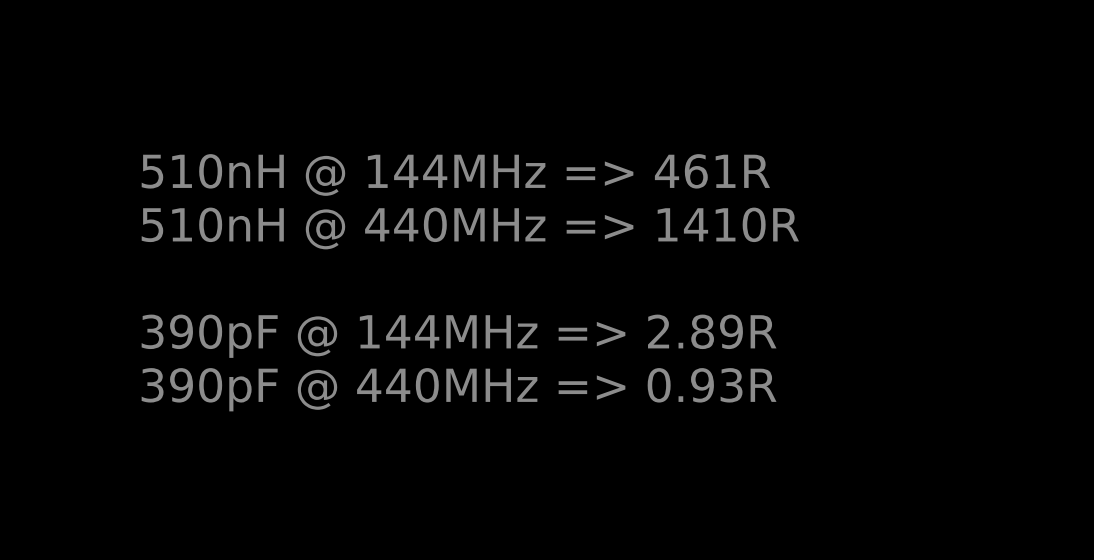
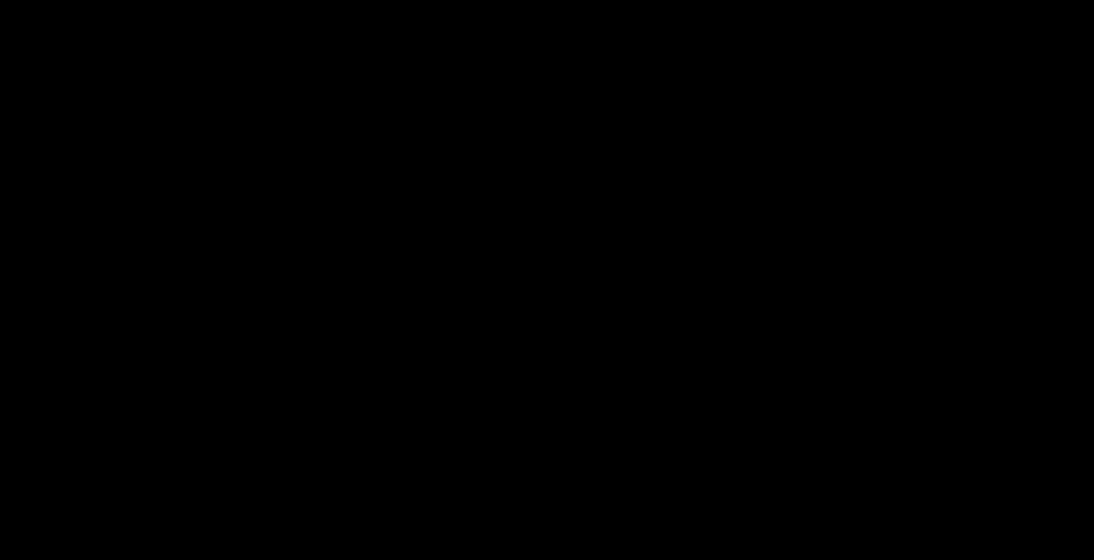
text: 510nH @ 144MHz => 461R (455, 174) -> none
text: 510nH @ 440MHz => 1410R (470, 228) -> none
text: 390pF @ 144MHz => 2.89R (459, 336) -> none
text: 390pF @ 440MHz => 0.93R (459, 389) -> none

